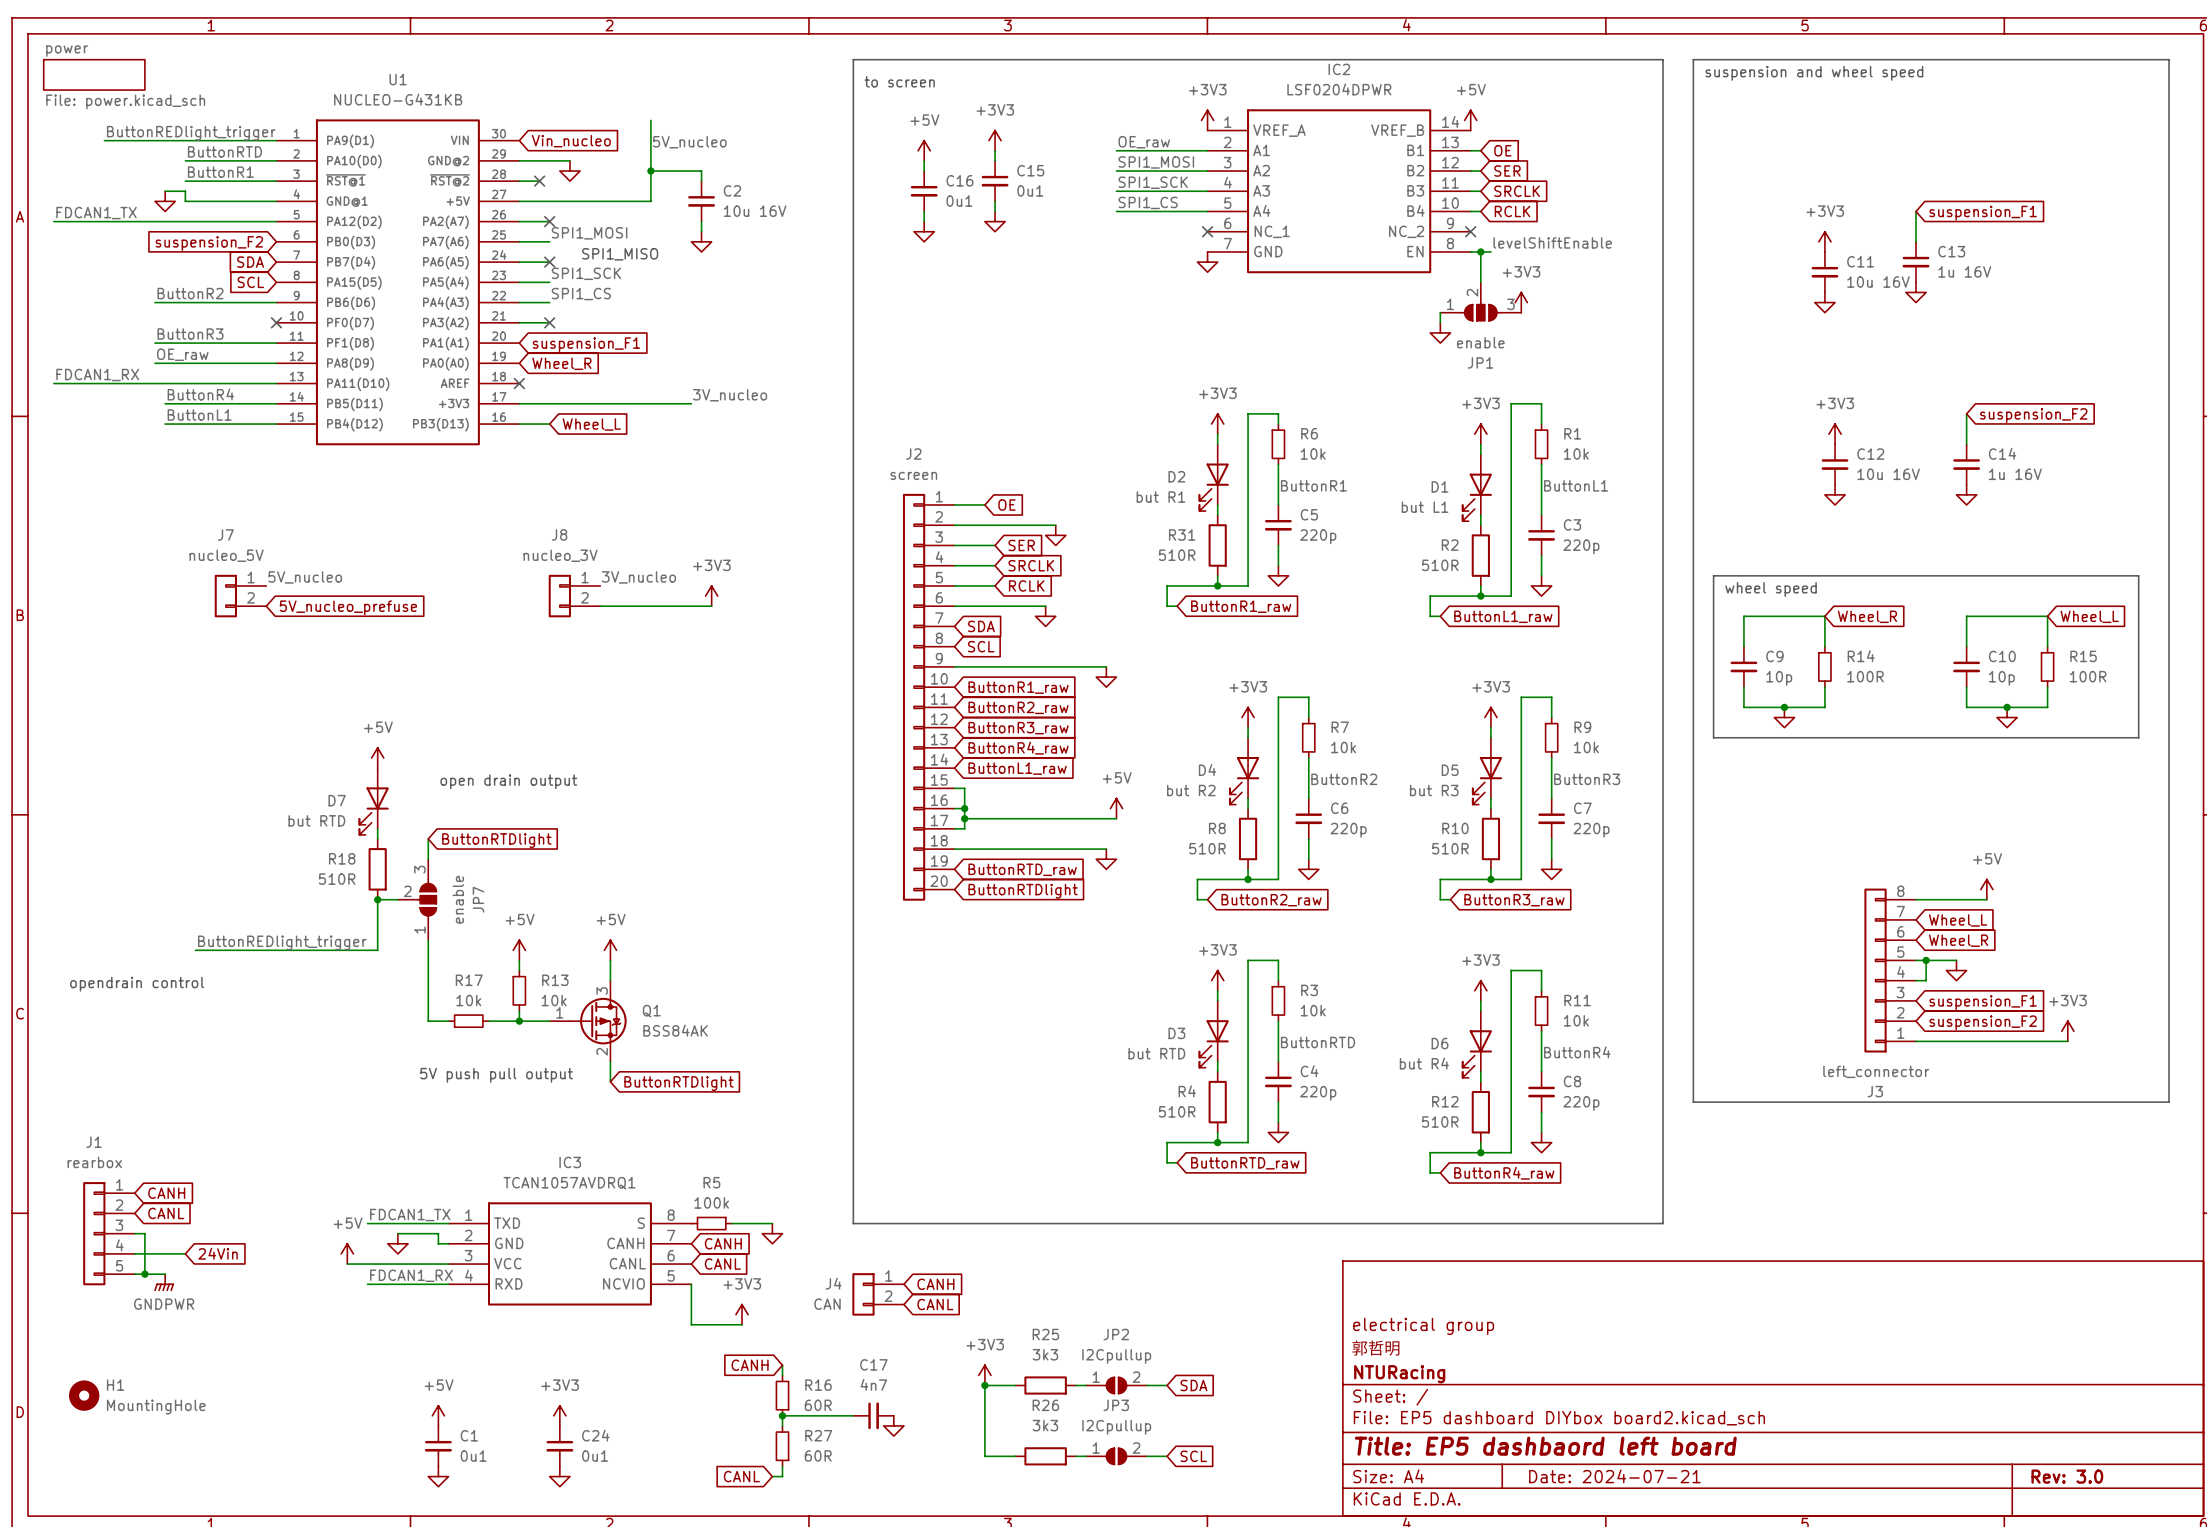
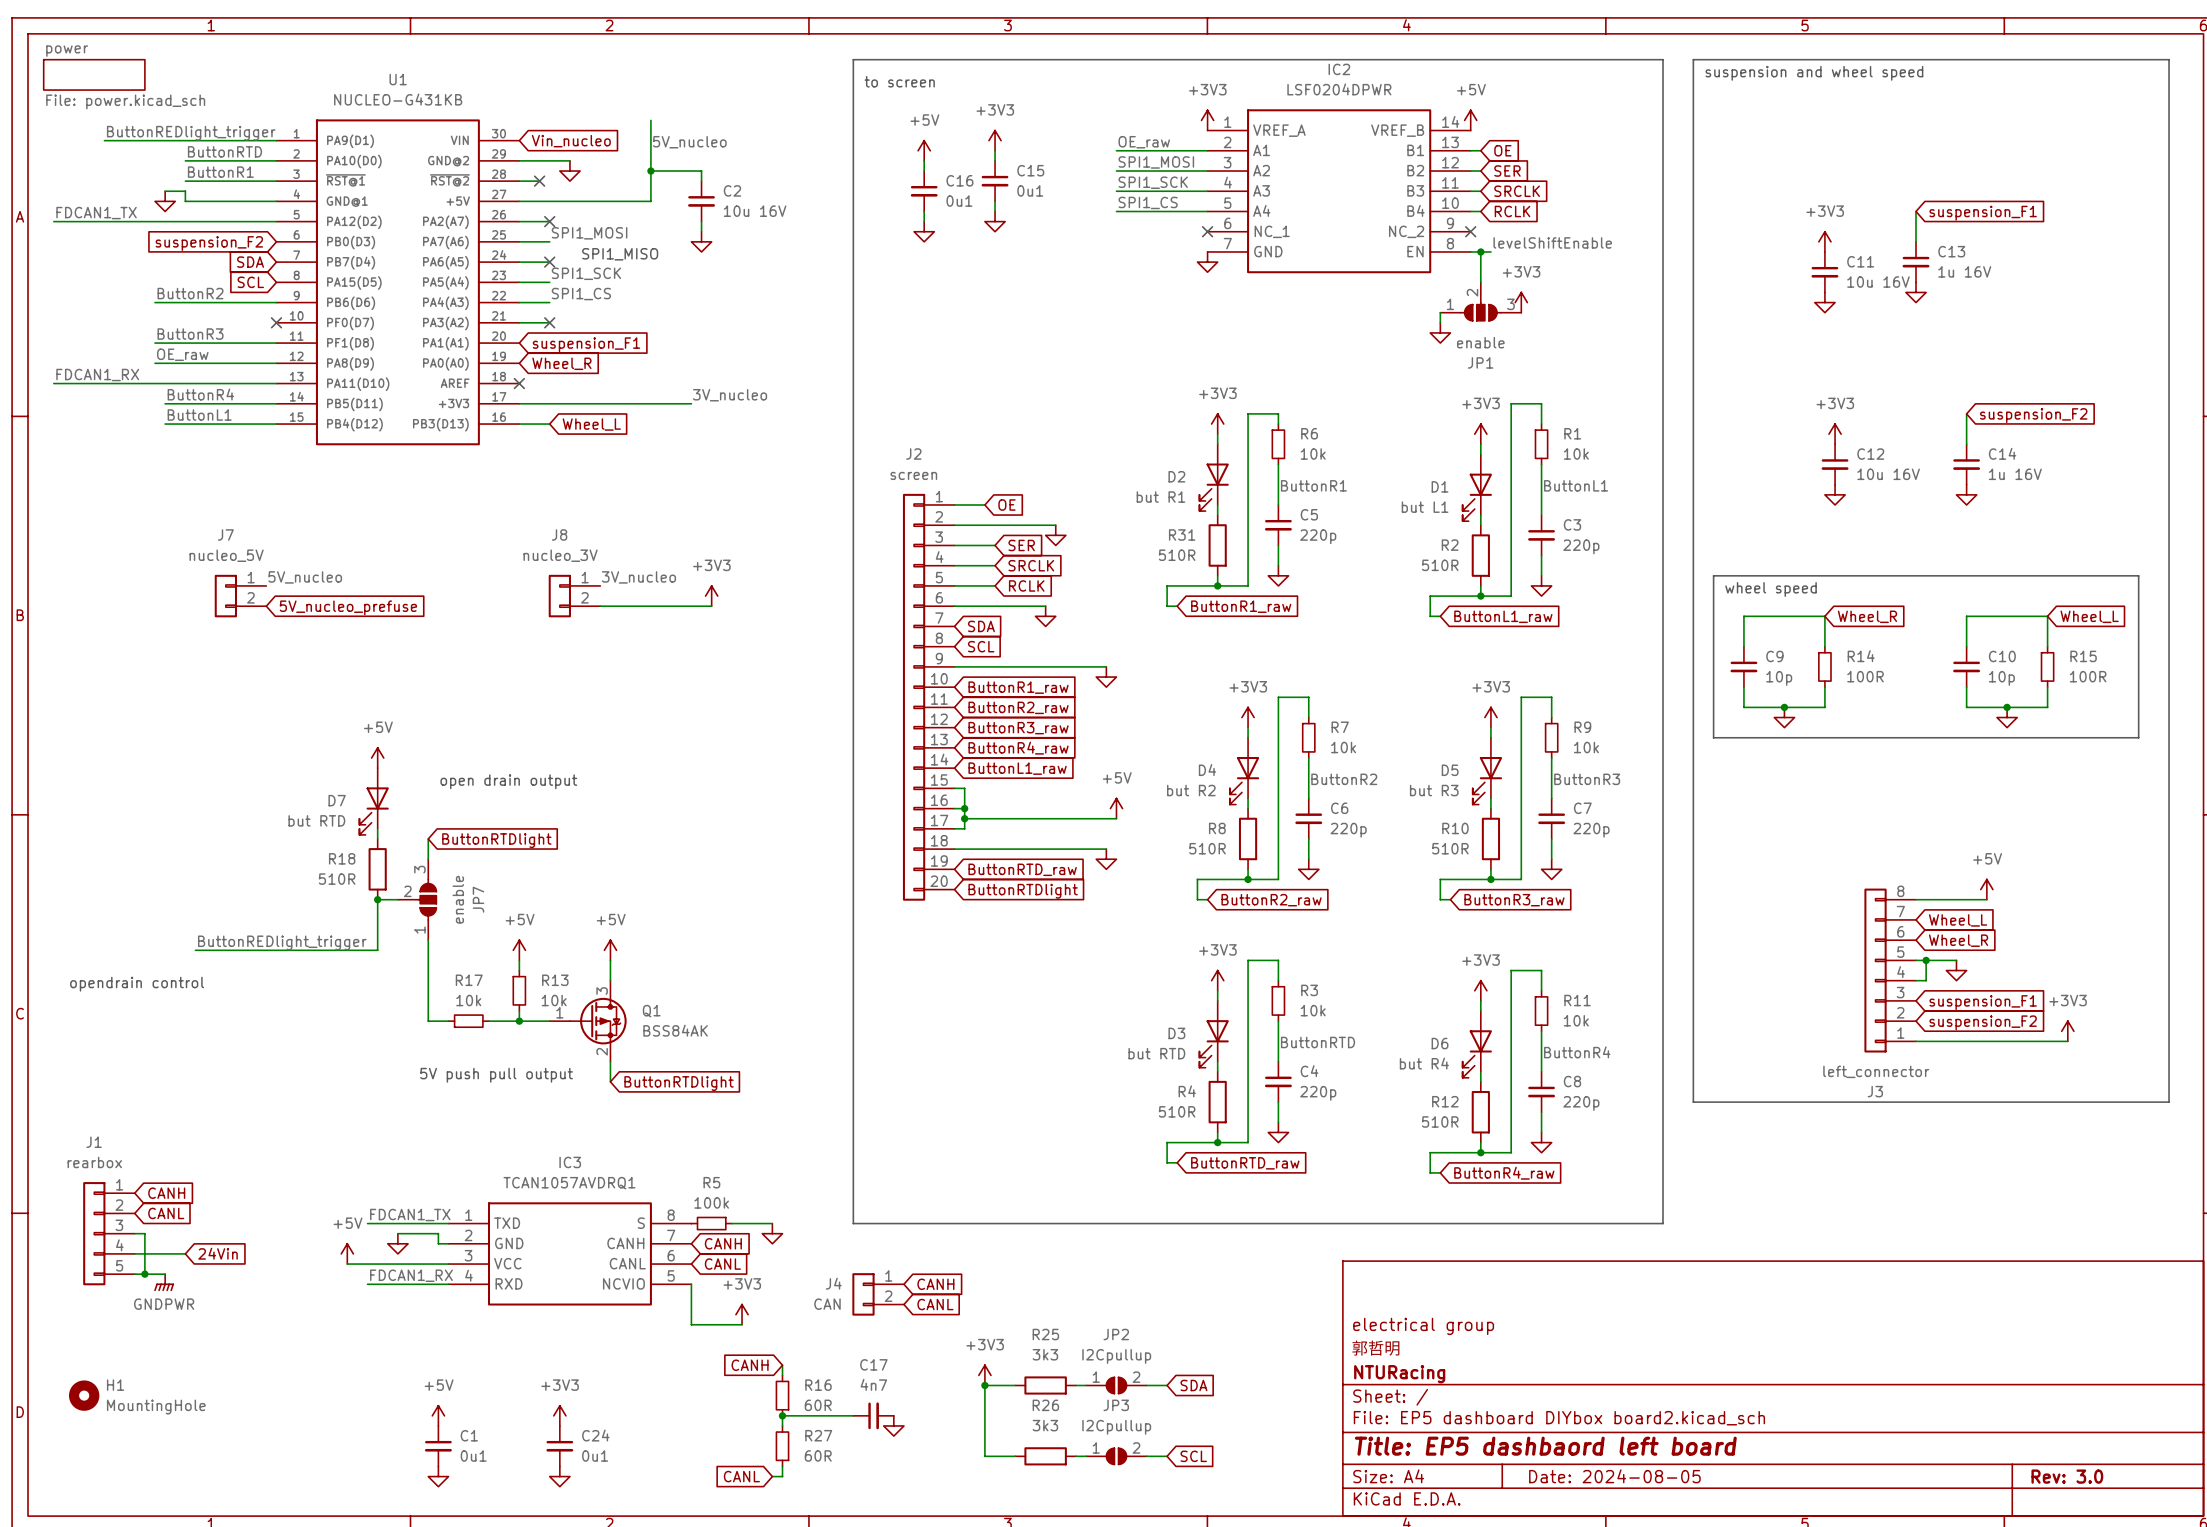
title block: Date: 2024-07-21 (1614, 1476) -> Date: 2024-08-05 (1614, 1476)

